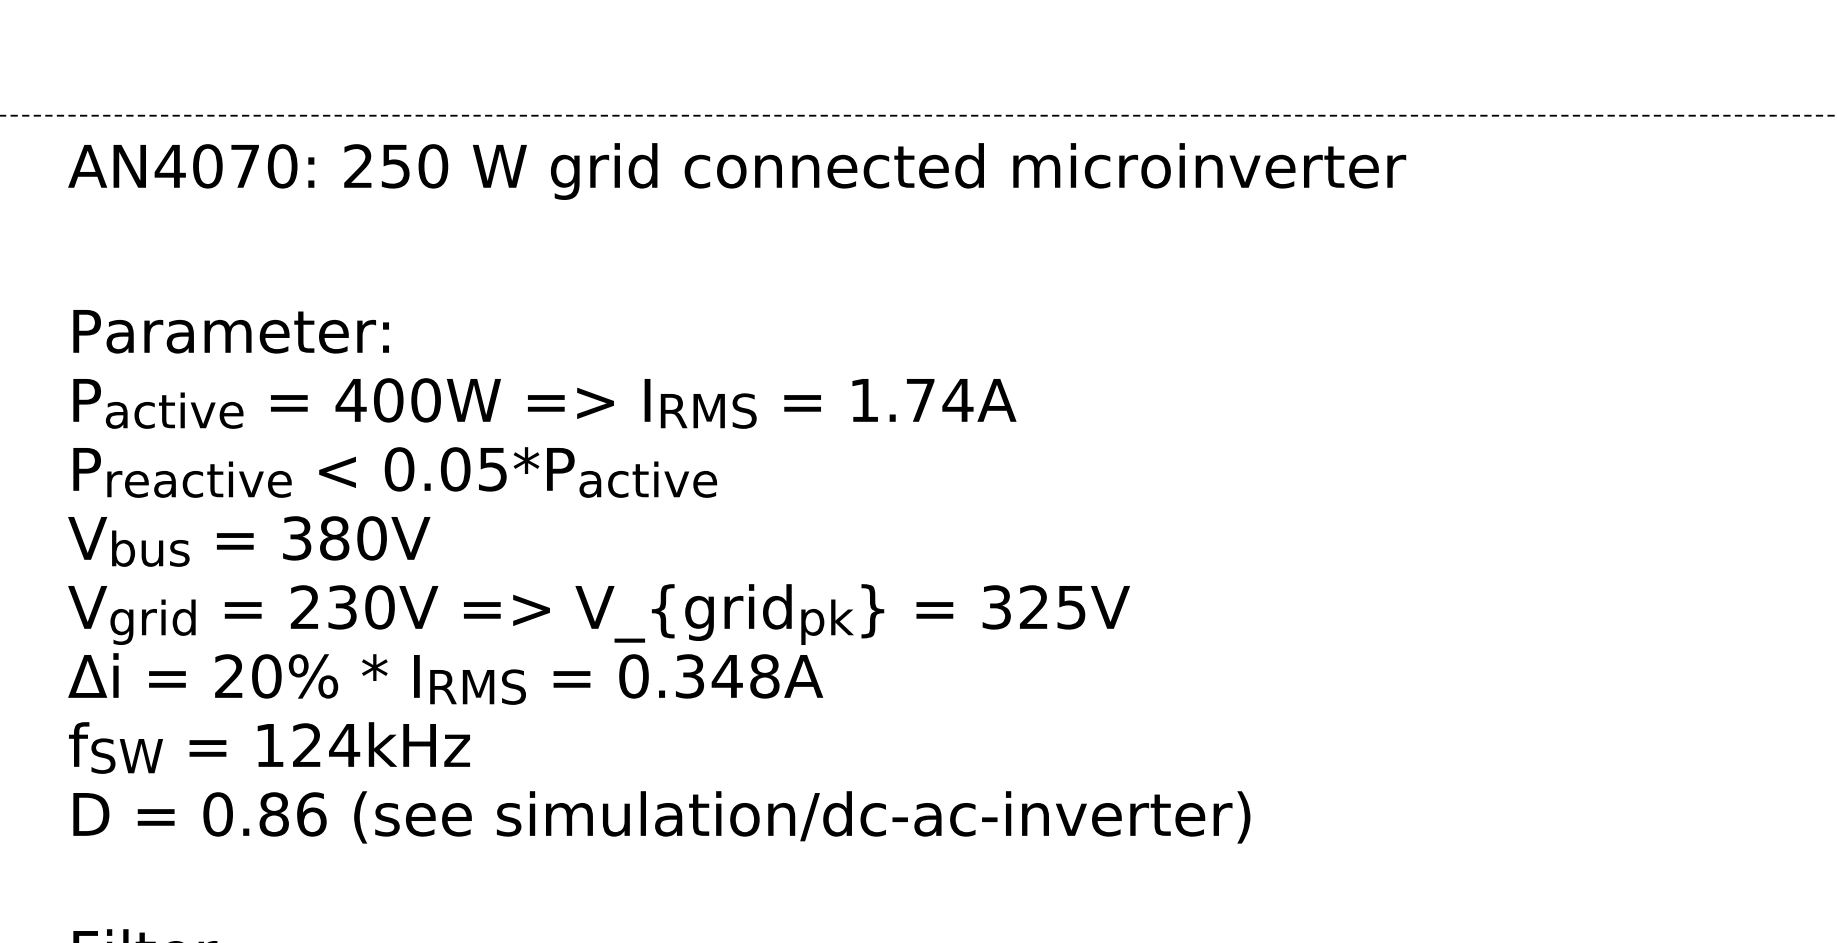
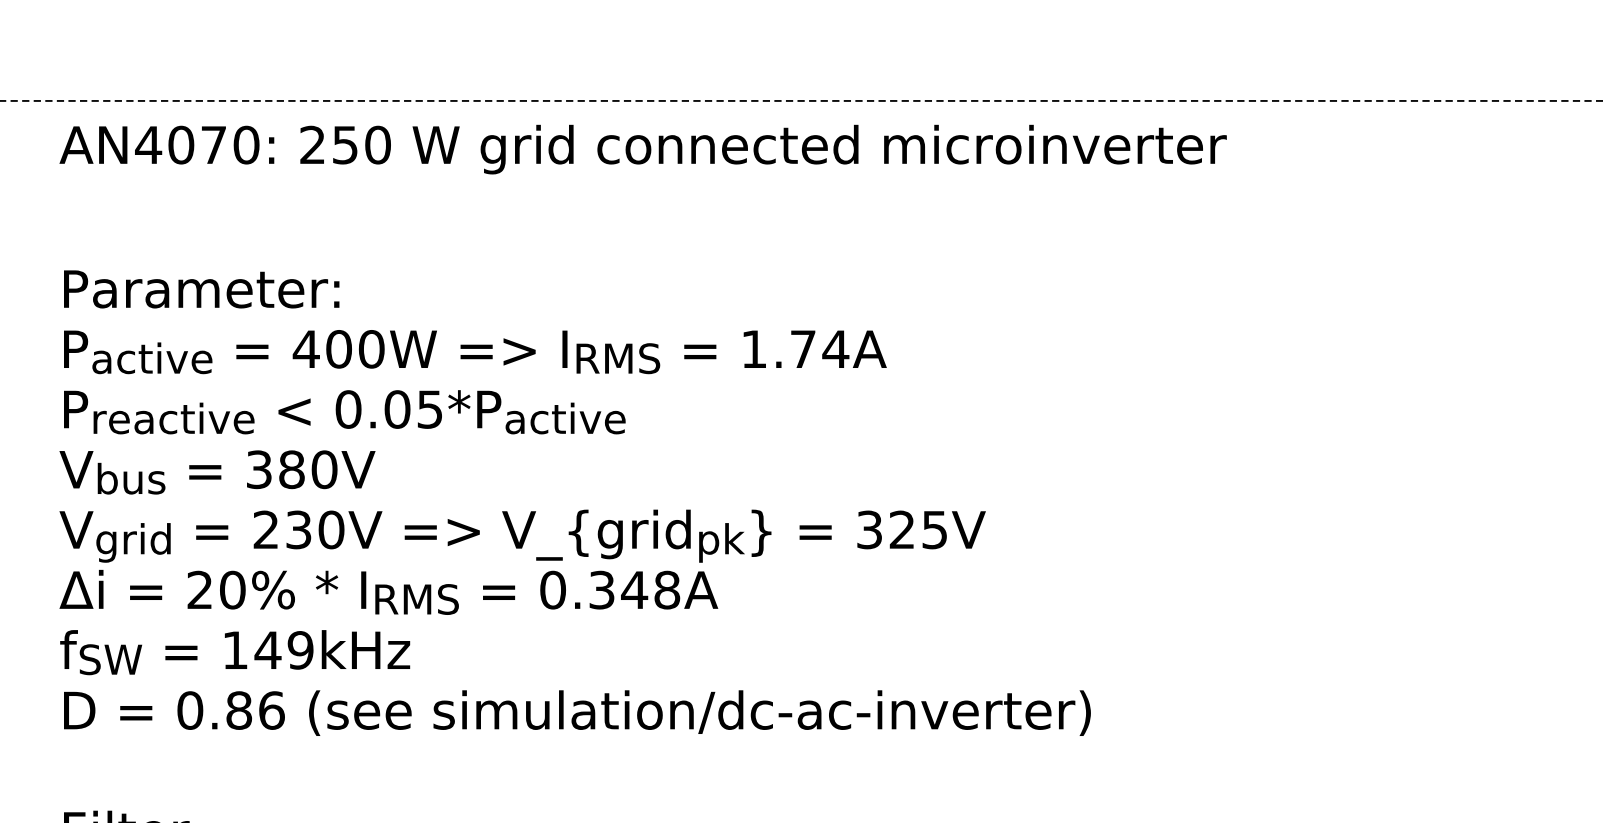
text: fSW = 124kHz (269, 748) -> fSW = 149kHz (235, 652)

